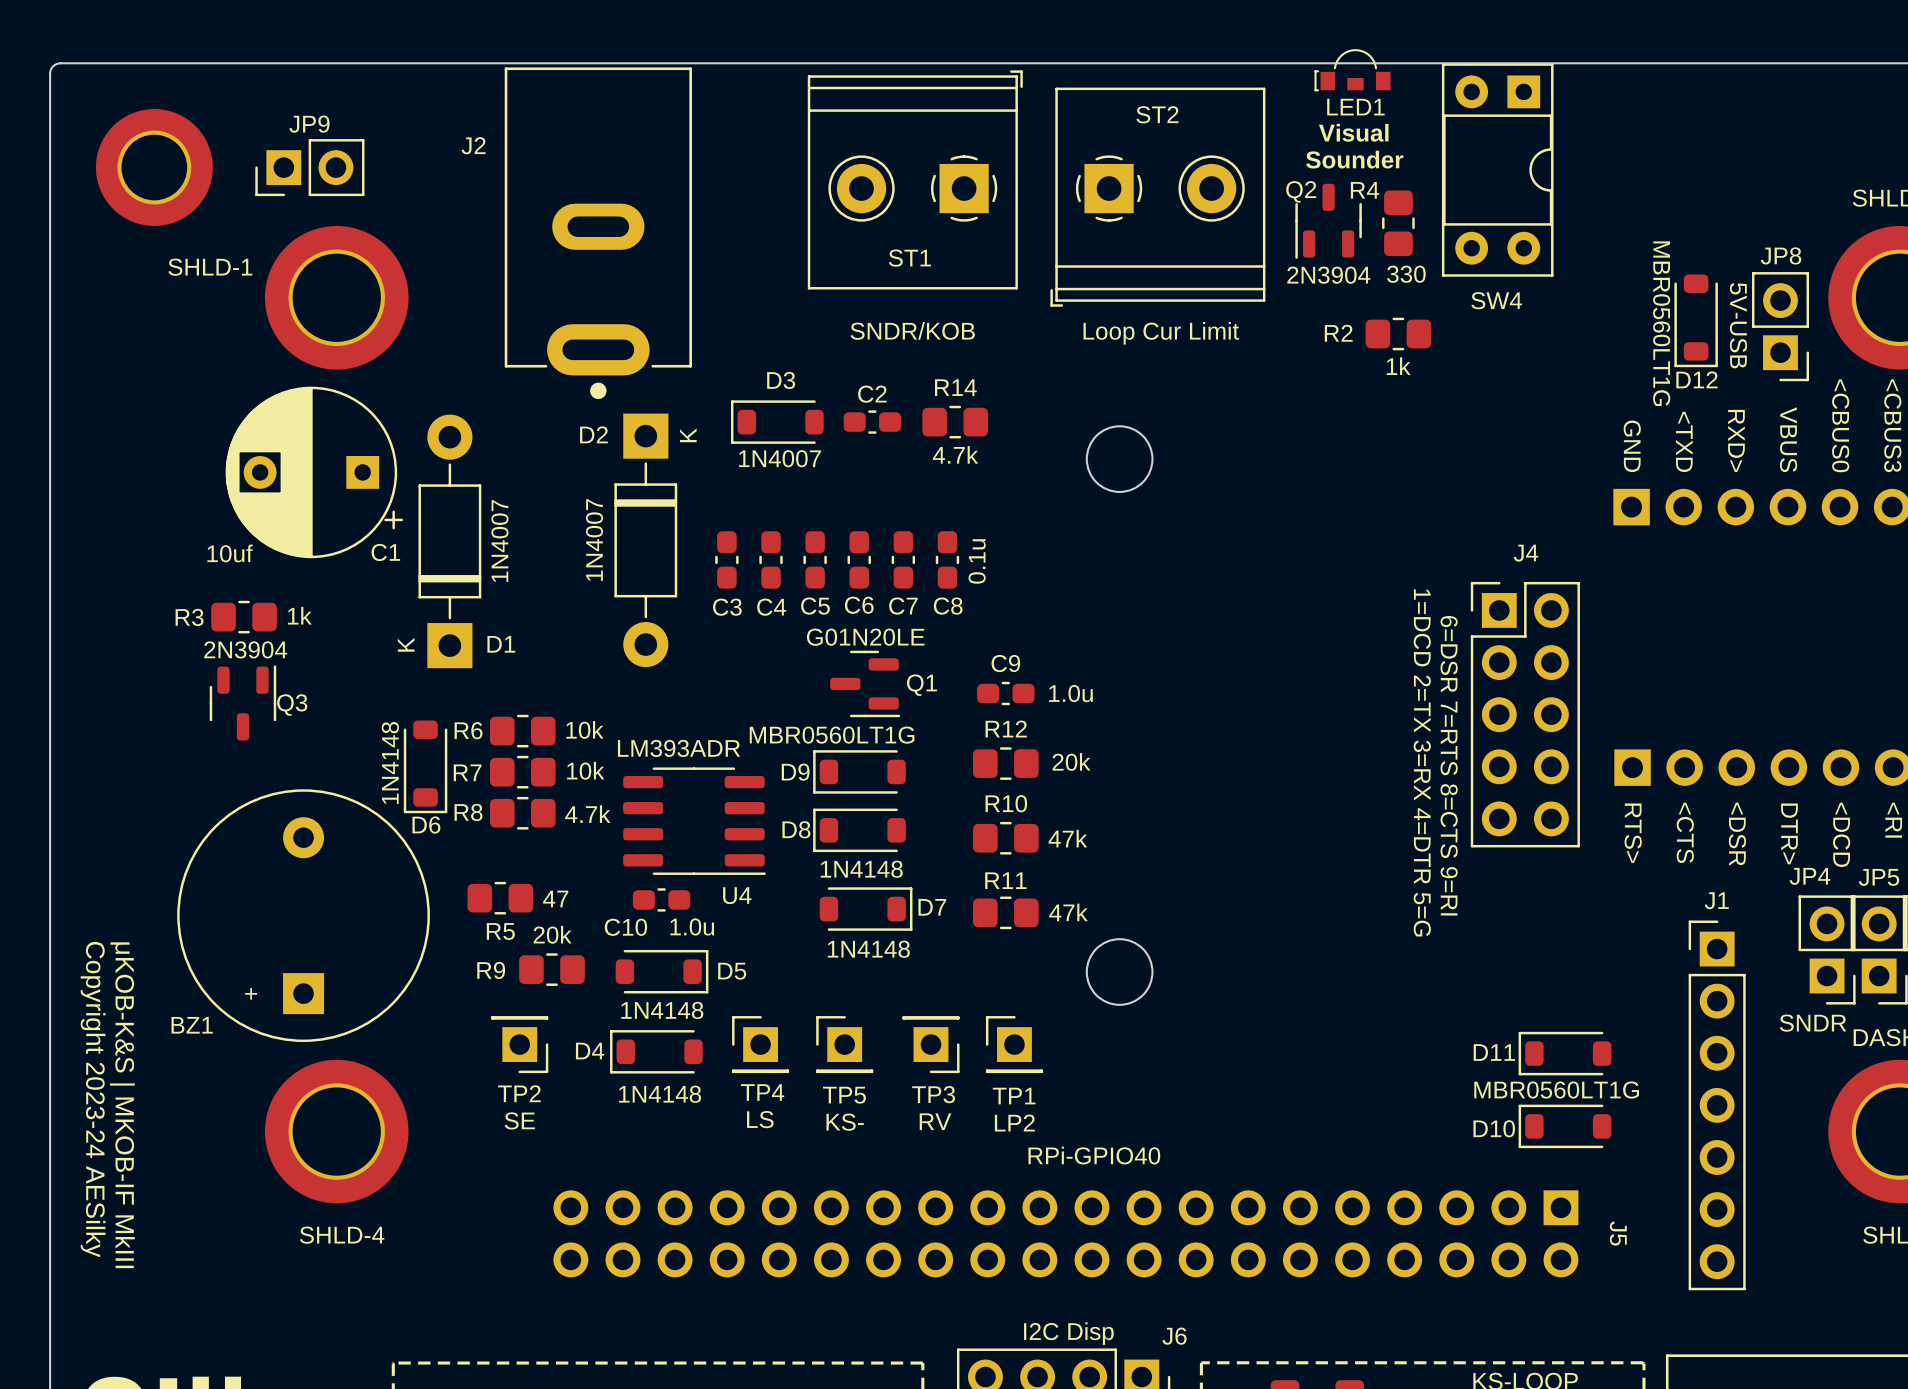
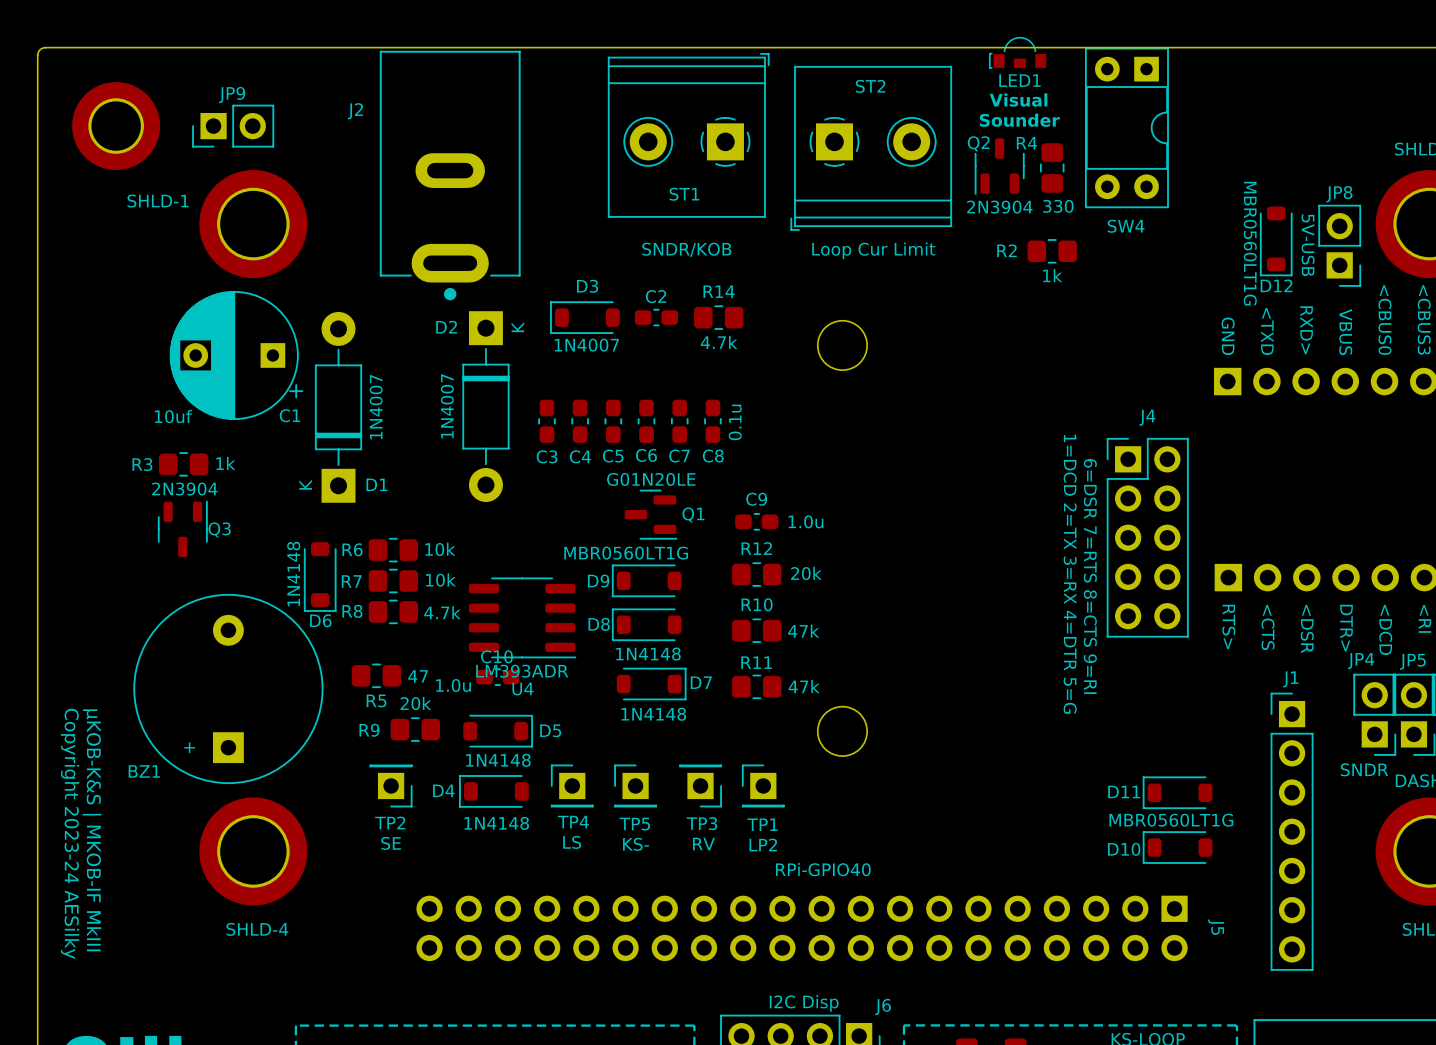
U4 value position: LM393ADR (678, 748) -> LM393ADR (522, 671)
U4 name position: U4 (737, 895) -> U4 (522, 689)
C10 value position: 1.0u (692, 926) -> 1.0u (453, 685)
C10 name position: C10 (625, 927) -> C10 (497, 656)

